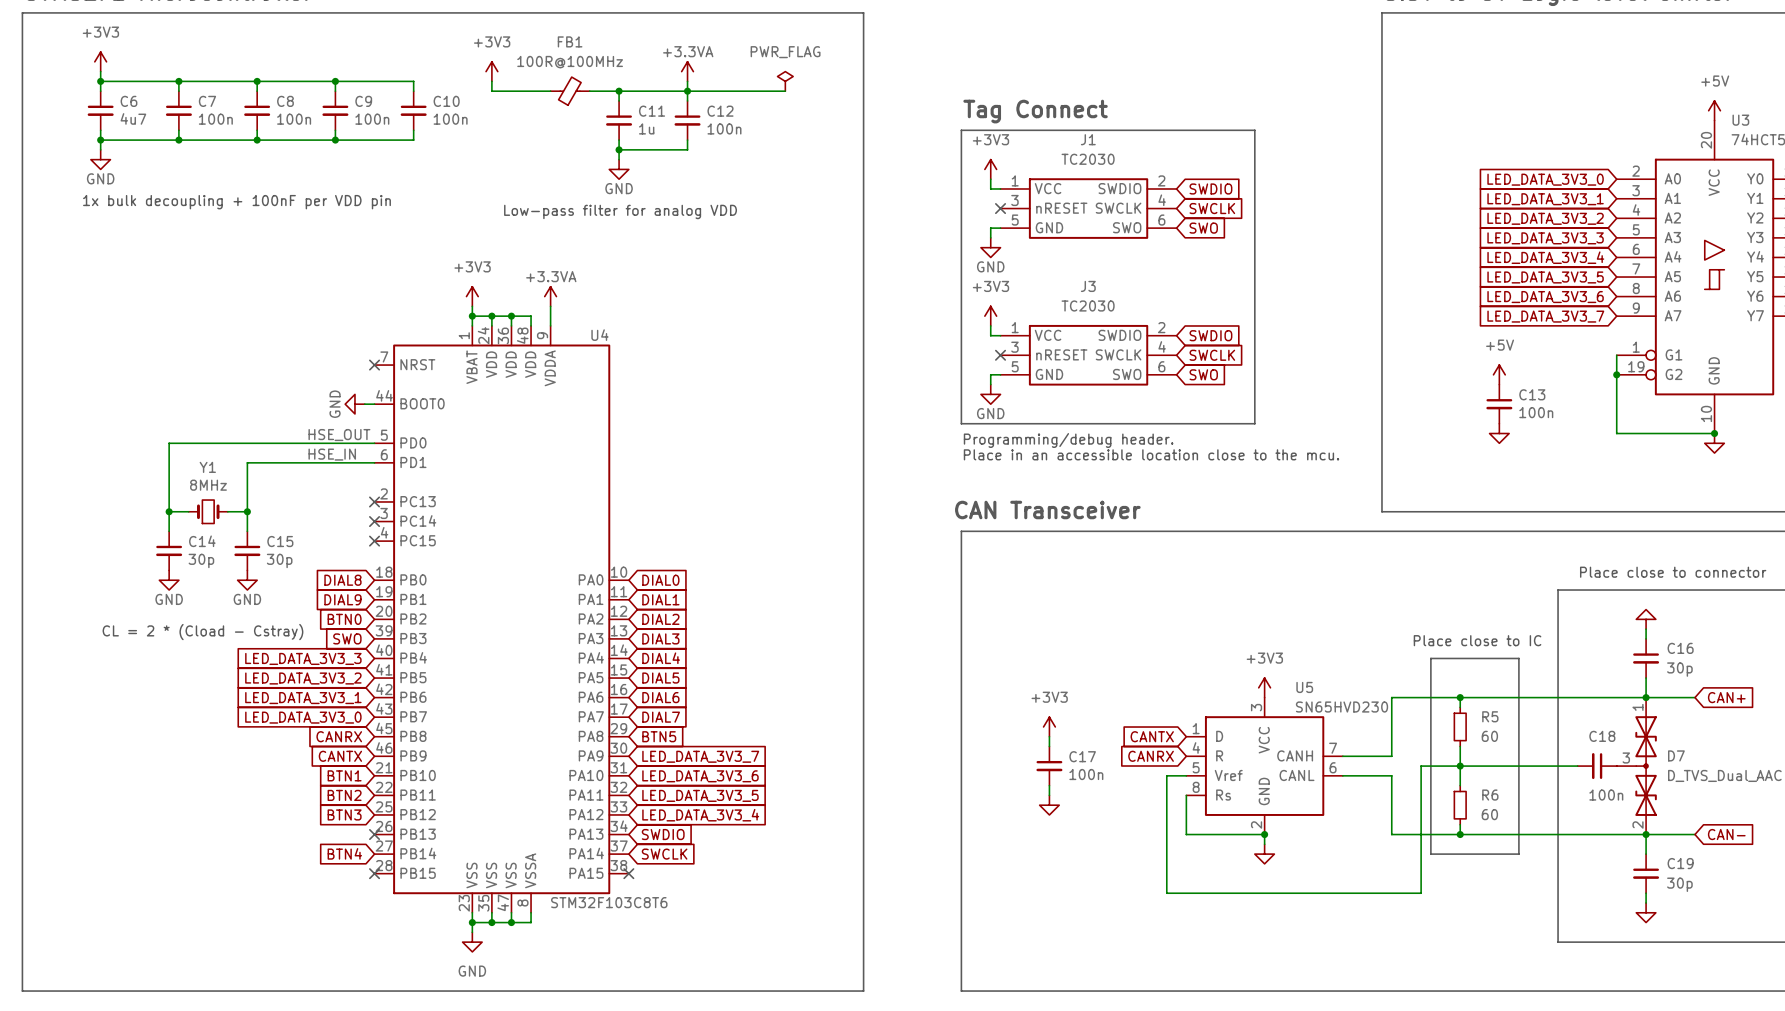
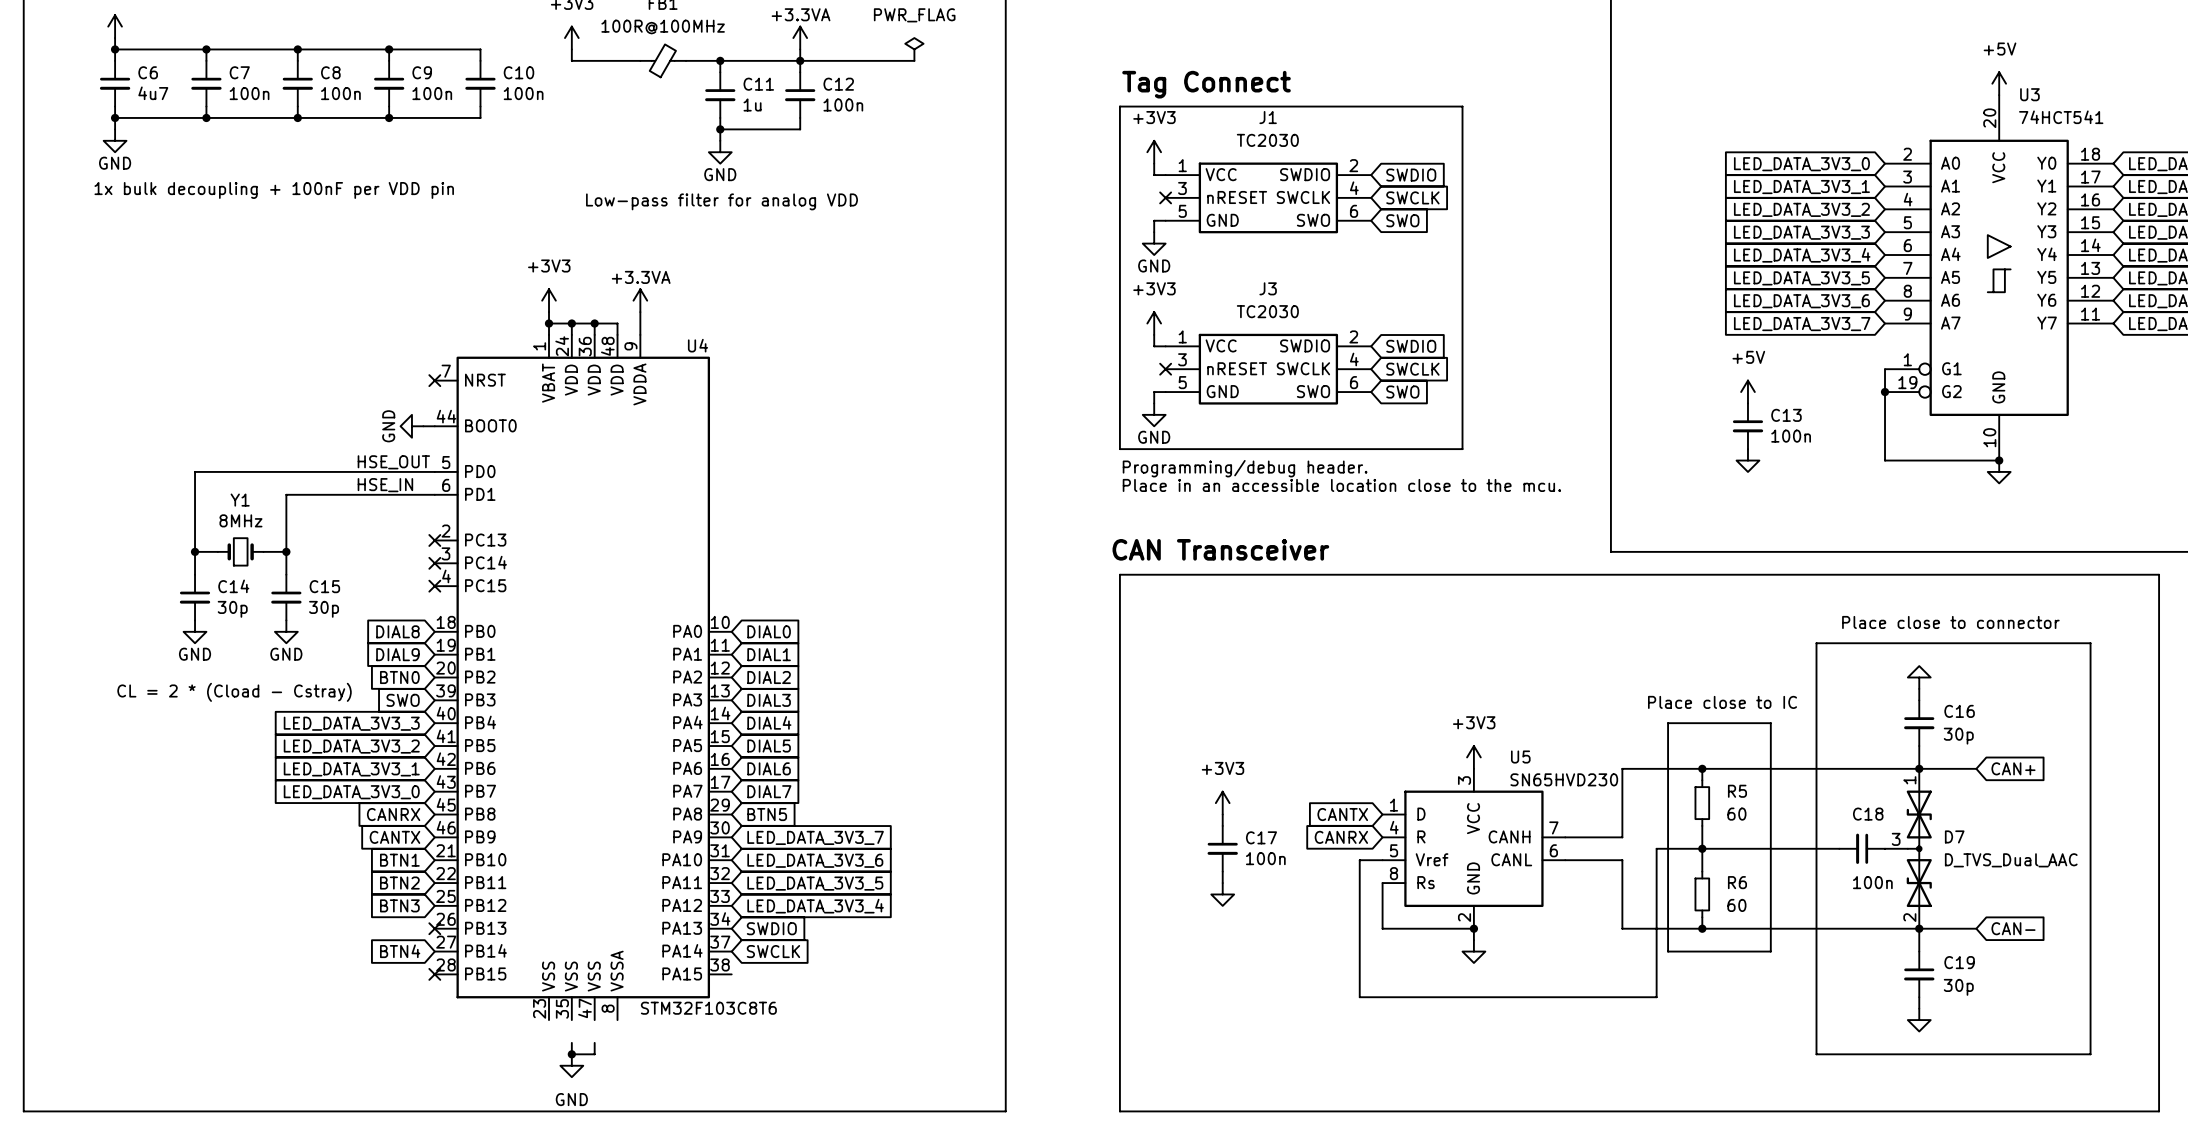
no-connect mark: (628, 873) -> none
wire: (472, 912) (472, 932) -> none
wire: (491, 912) (491, 922) -> none
wire: (511, 912) (511, 922) -> none
wire: (531, 912) (531, 922) (472, 922) -> none
junction: (472, 922) -> none
junction: (491, 922) -> none
junction: (511, 922) -> none
wire: none -> (571, 1042) (571, 1054) (594, 1054) (594, 1042)
power symbol position: GND (472, 942) -> GND (571, 1065)
junction: none -> (571, 1054)

